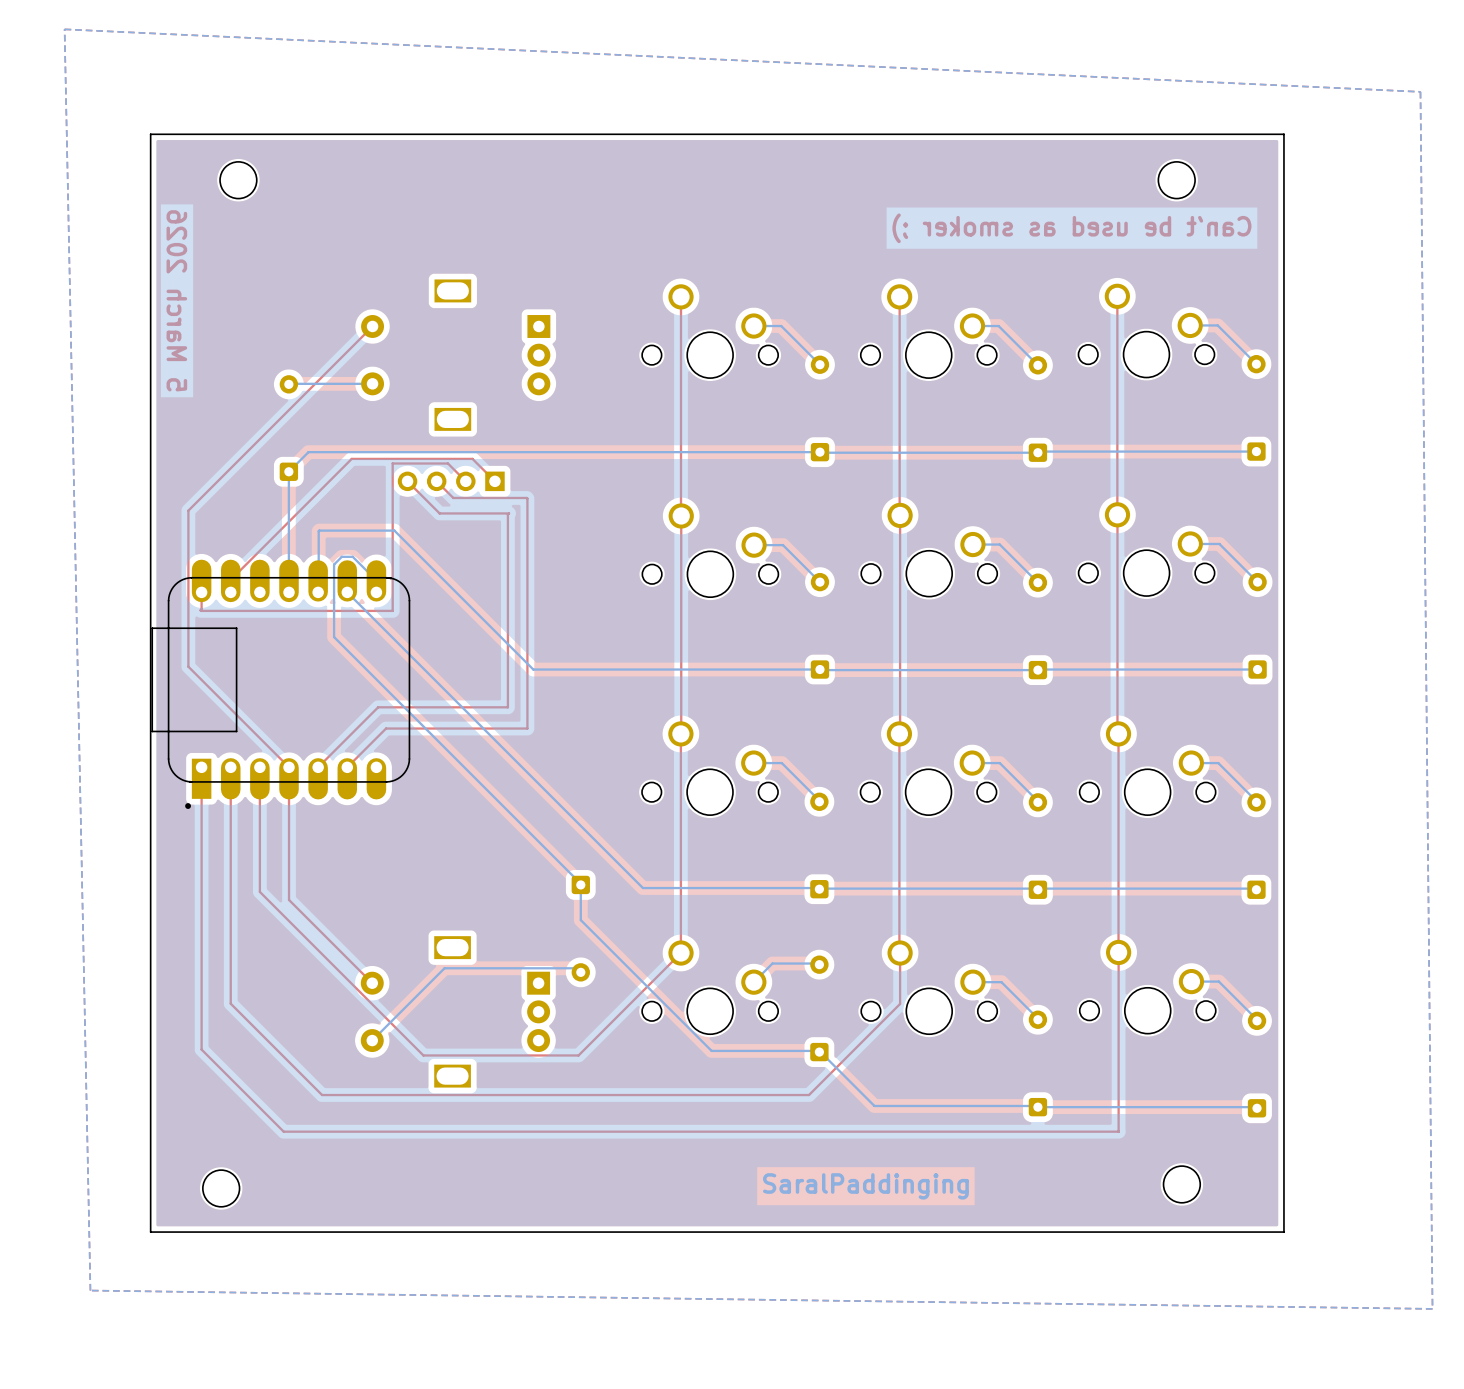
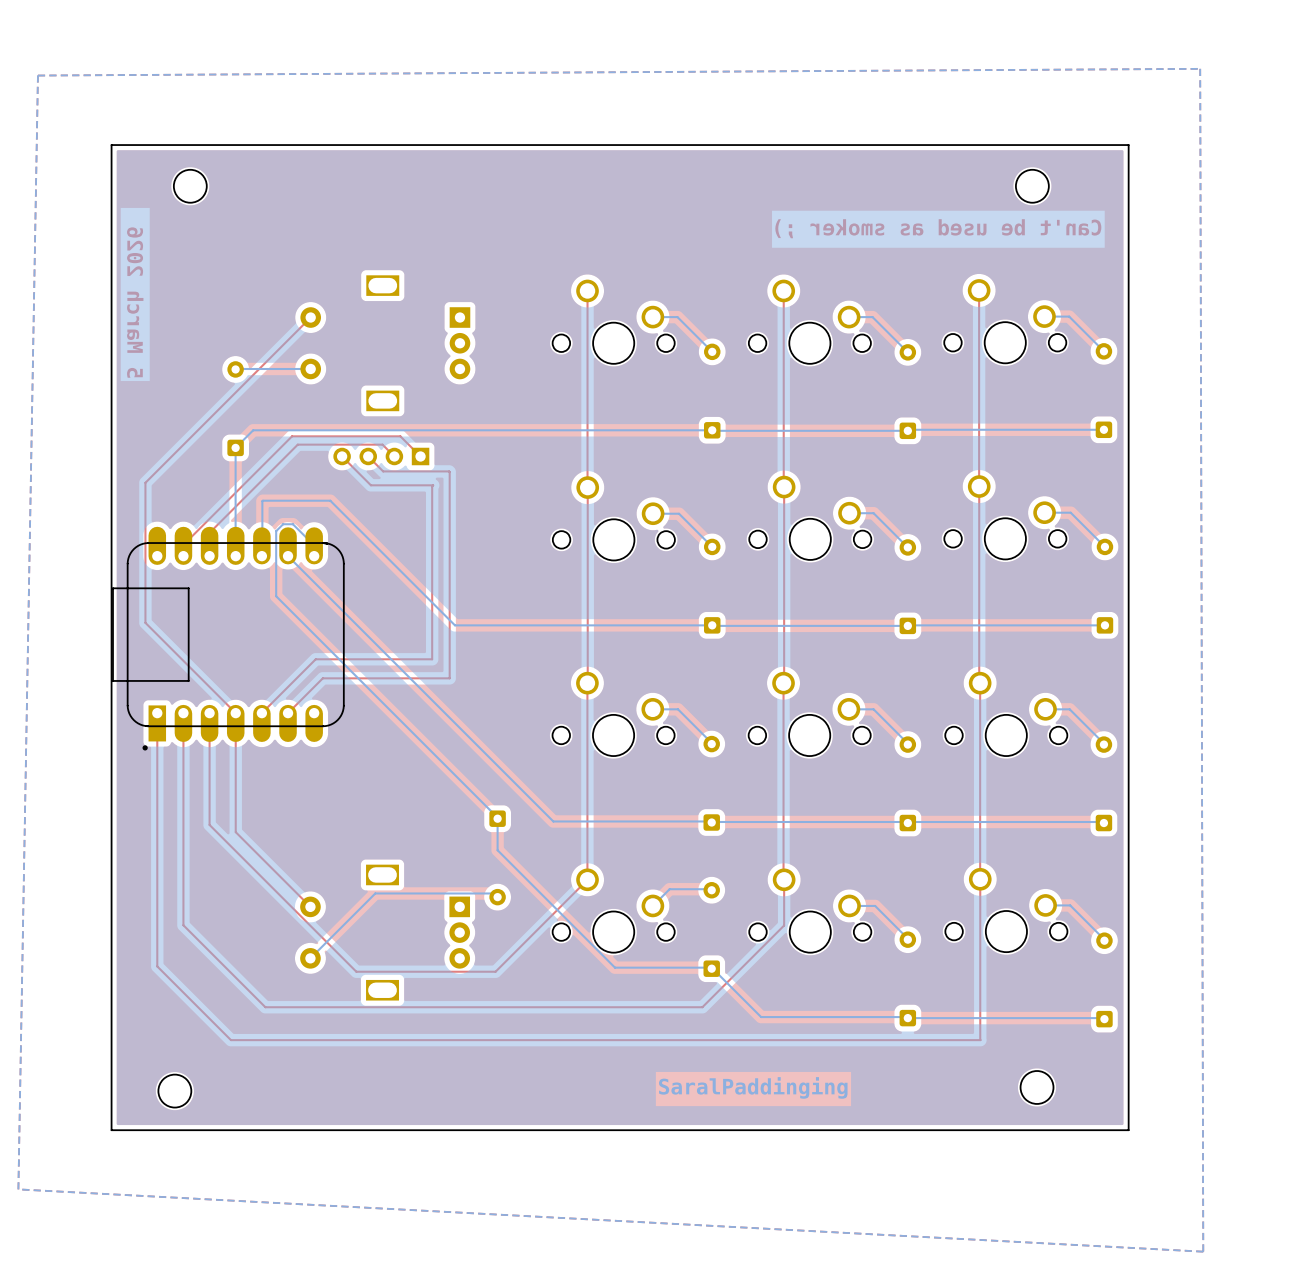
bottom zone outline: (64, 29) (90, 1290) (1432, 1308) (1420, 91) (64, 29) -> (1200, 68) (1203, 1251) (18, 1189) (37, 75) (1200, 68)
top track: (452, 468) (447, 463) (392, 463) (392, 610) (201, 610) (201, 592) -> (382, 444) (297, 444) (209, 532) (209, 556)

